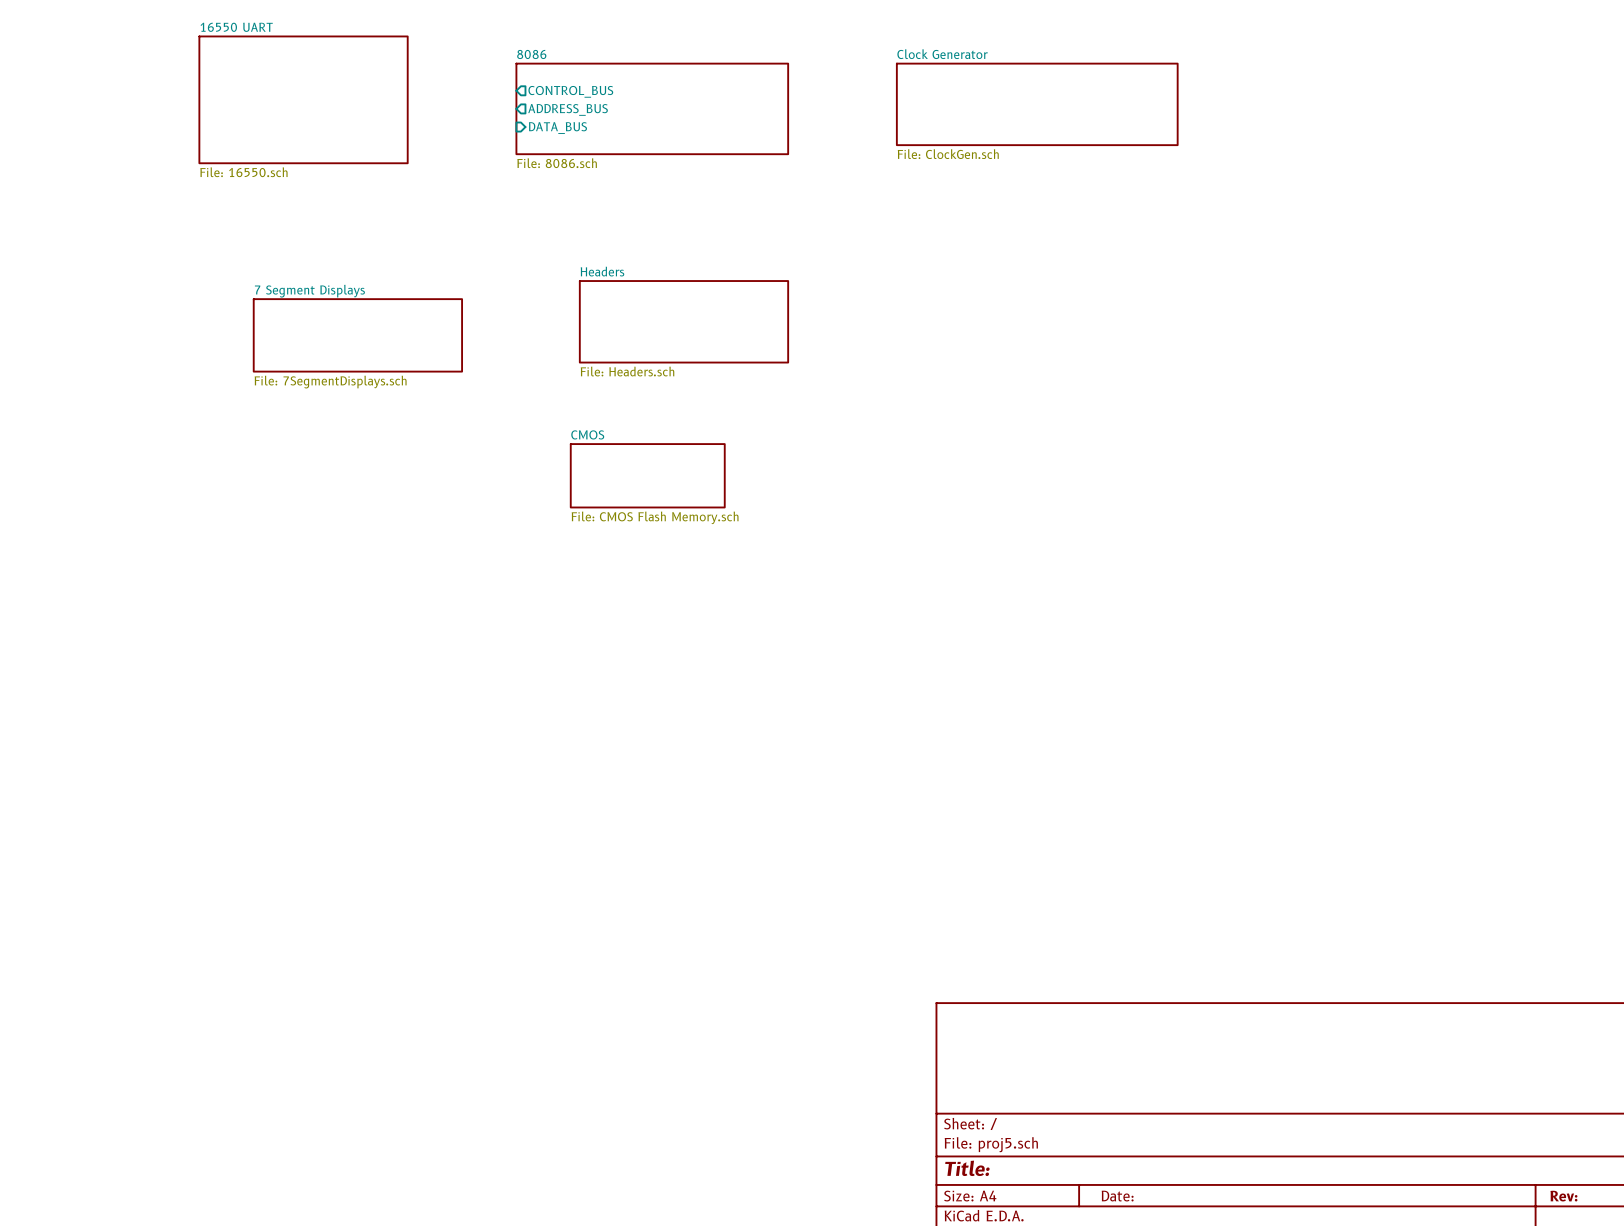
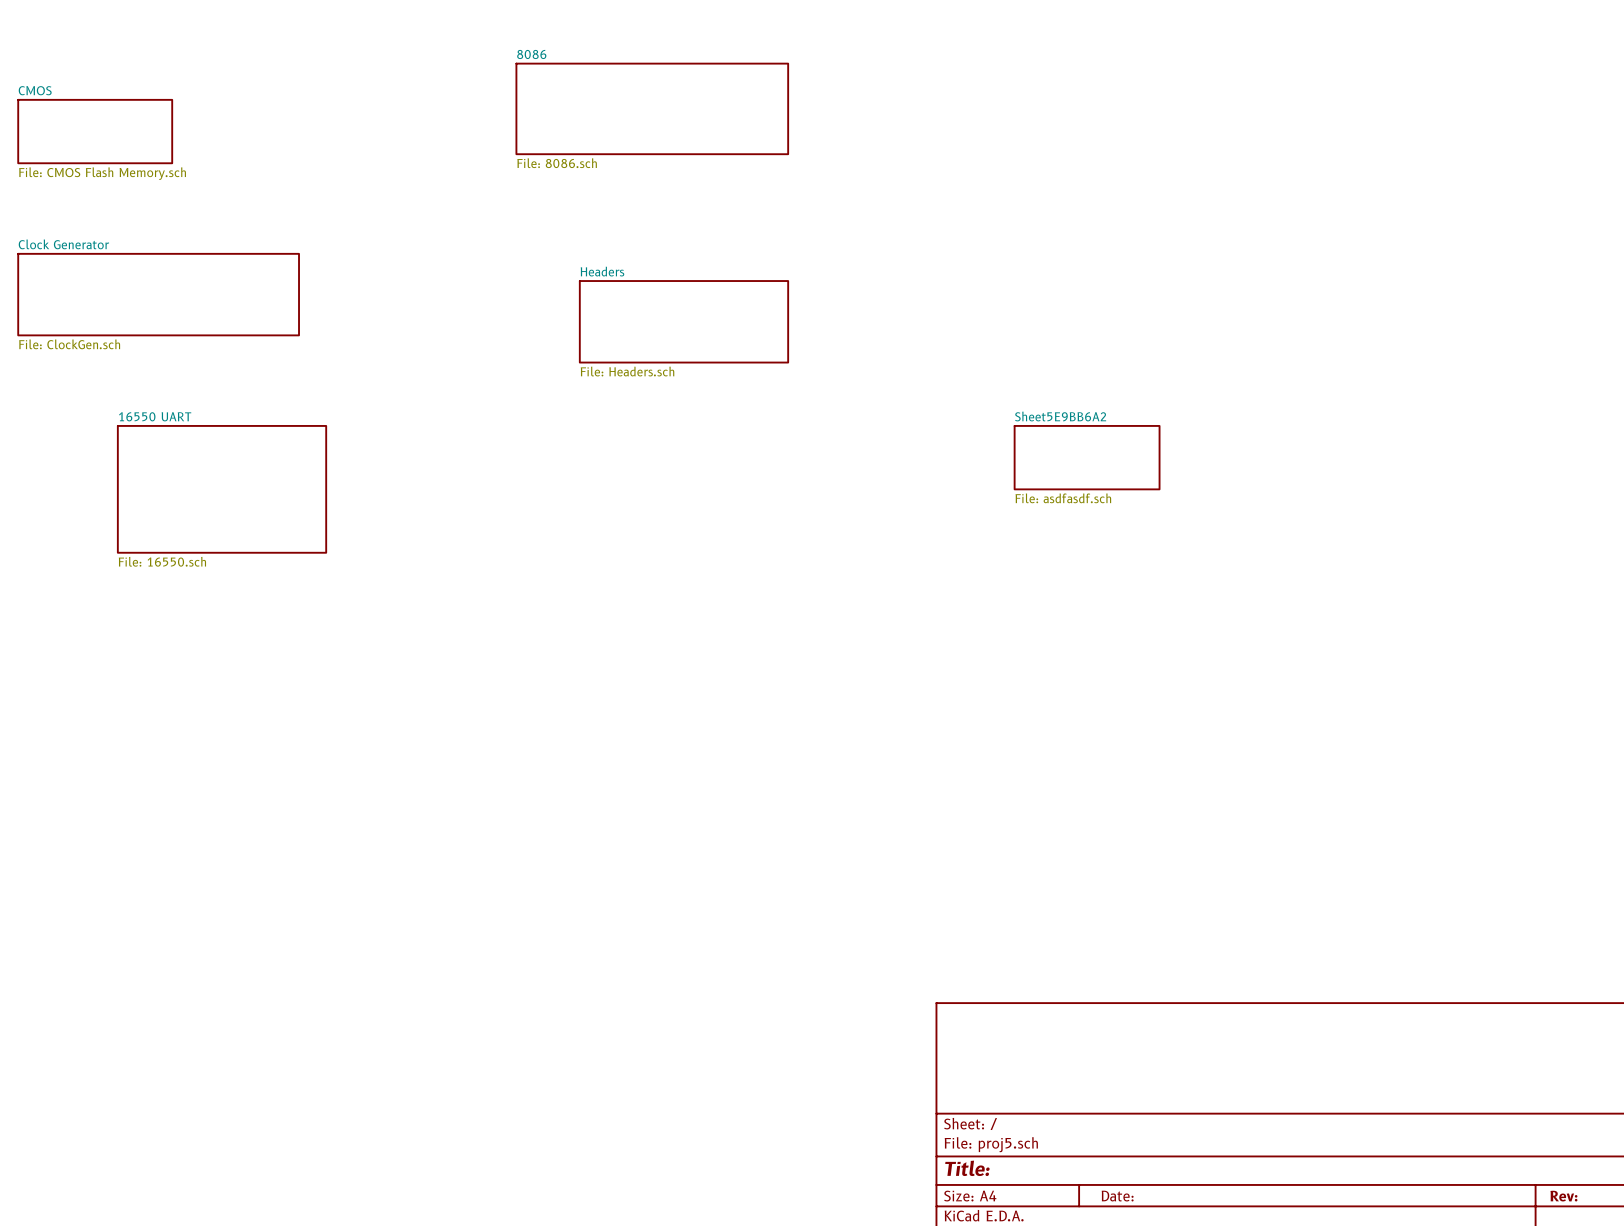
sheet pin: CONTROL_BUS (570, 91) -> none
sheet 16550 UART position: (303, 99) -> (222, 489)
sheet Clock Generator: File: ClockGen.sch (1037, 104) -> none
sheet pin: ADDRESS_BUS (568, 109) -> none
sheet pin: DATA_BUS (557, 128) -> none
sheet CMOS: none -> File: CMOS Flash Memory.sch (95, 131)
sheet Clock Generator: none -> File: ClockGen.sch (158, 294)
sheet 7 Segment Displays: File: 7SegmentDisplays.sch (357, 335) -> none
sheet Sheet5E9BB6A2: none -> File: asdfasdf.sch (1087, 457)
sheet CMOS: File: CMOS Flash Memory.sch (647, 475) -> none

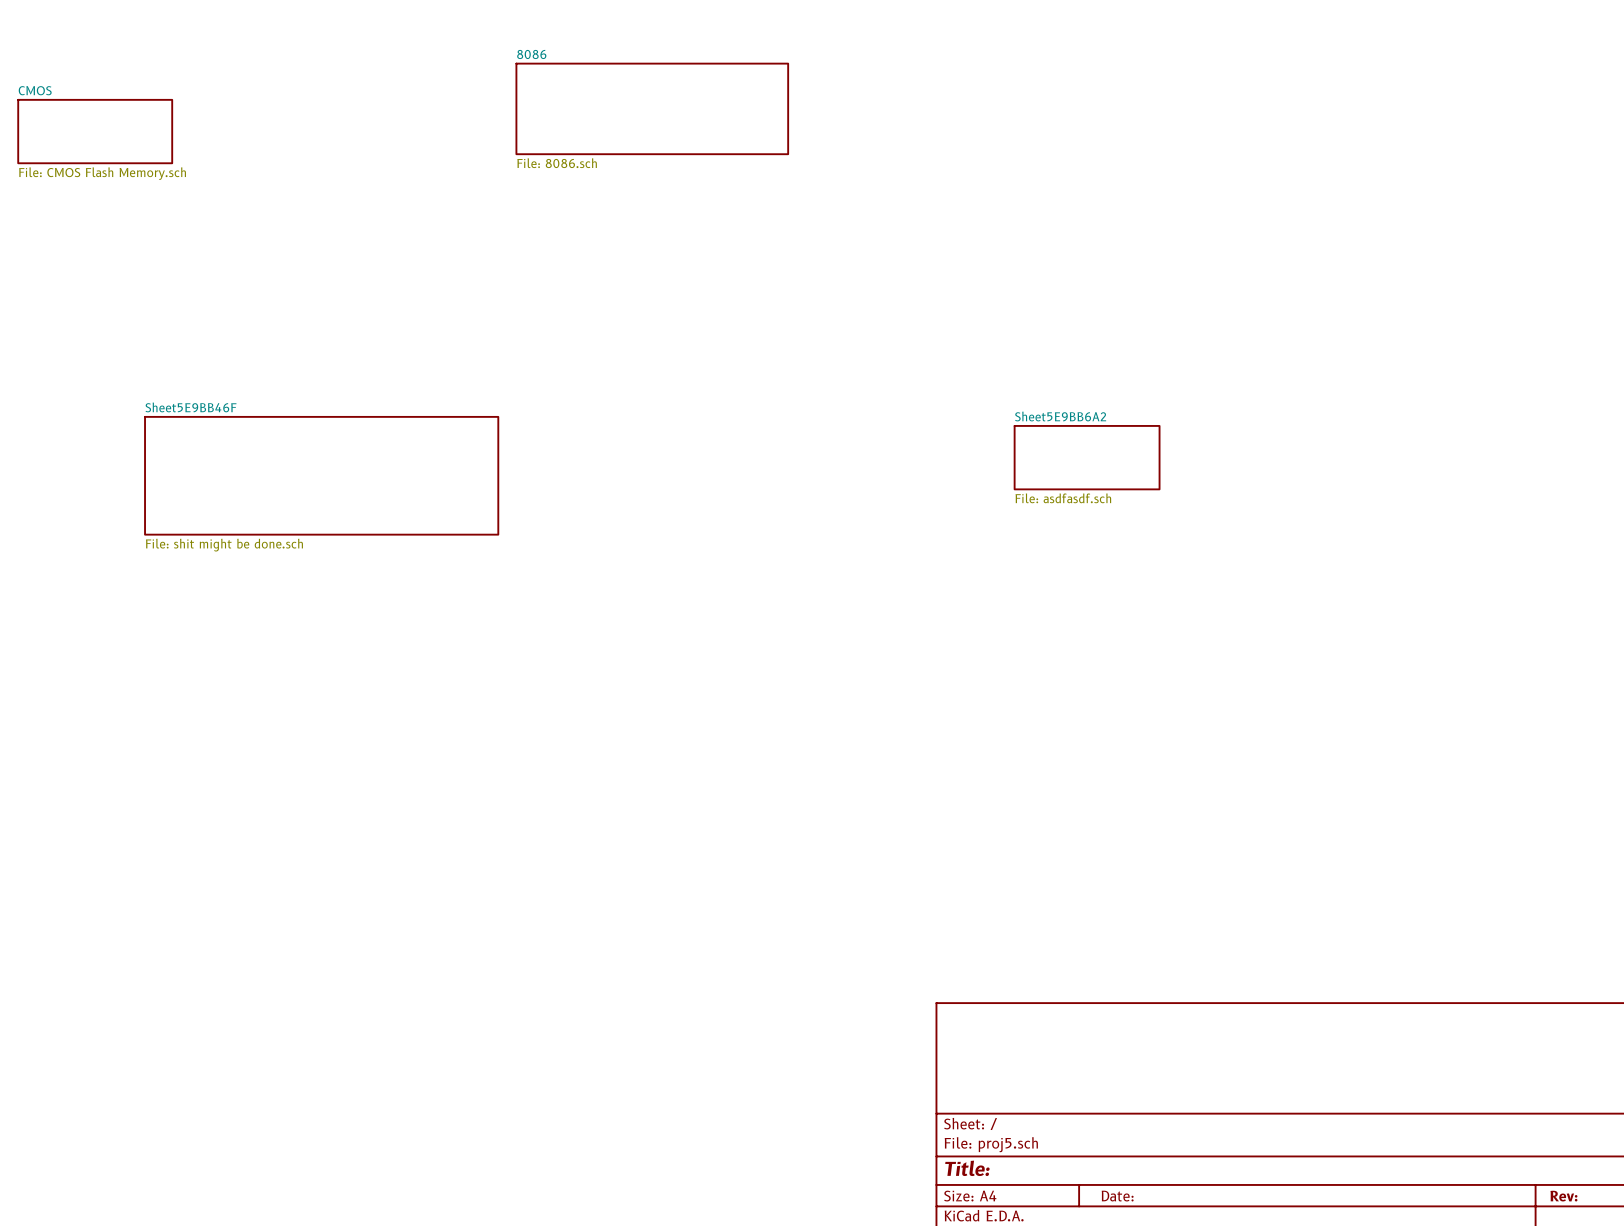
sheet Clock Generator: File: ClockGen.sch (158, 294) -> none
sheet Headers: File: Headers.sch (683, 321) -> none
sheet Sheet5E9BB46F: none -> File: shit might be done.sch (321, 475)
sheet 16550 UART: File: 16550.sch (222, 489) -> none

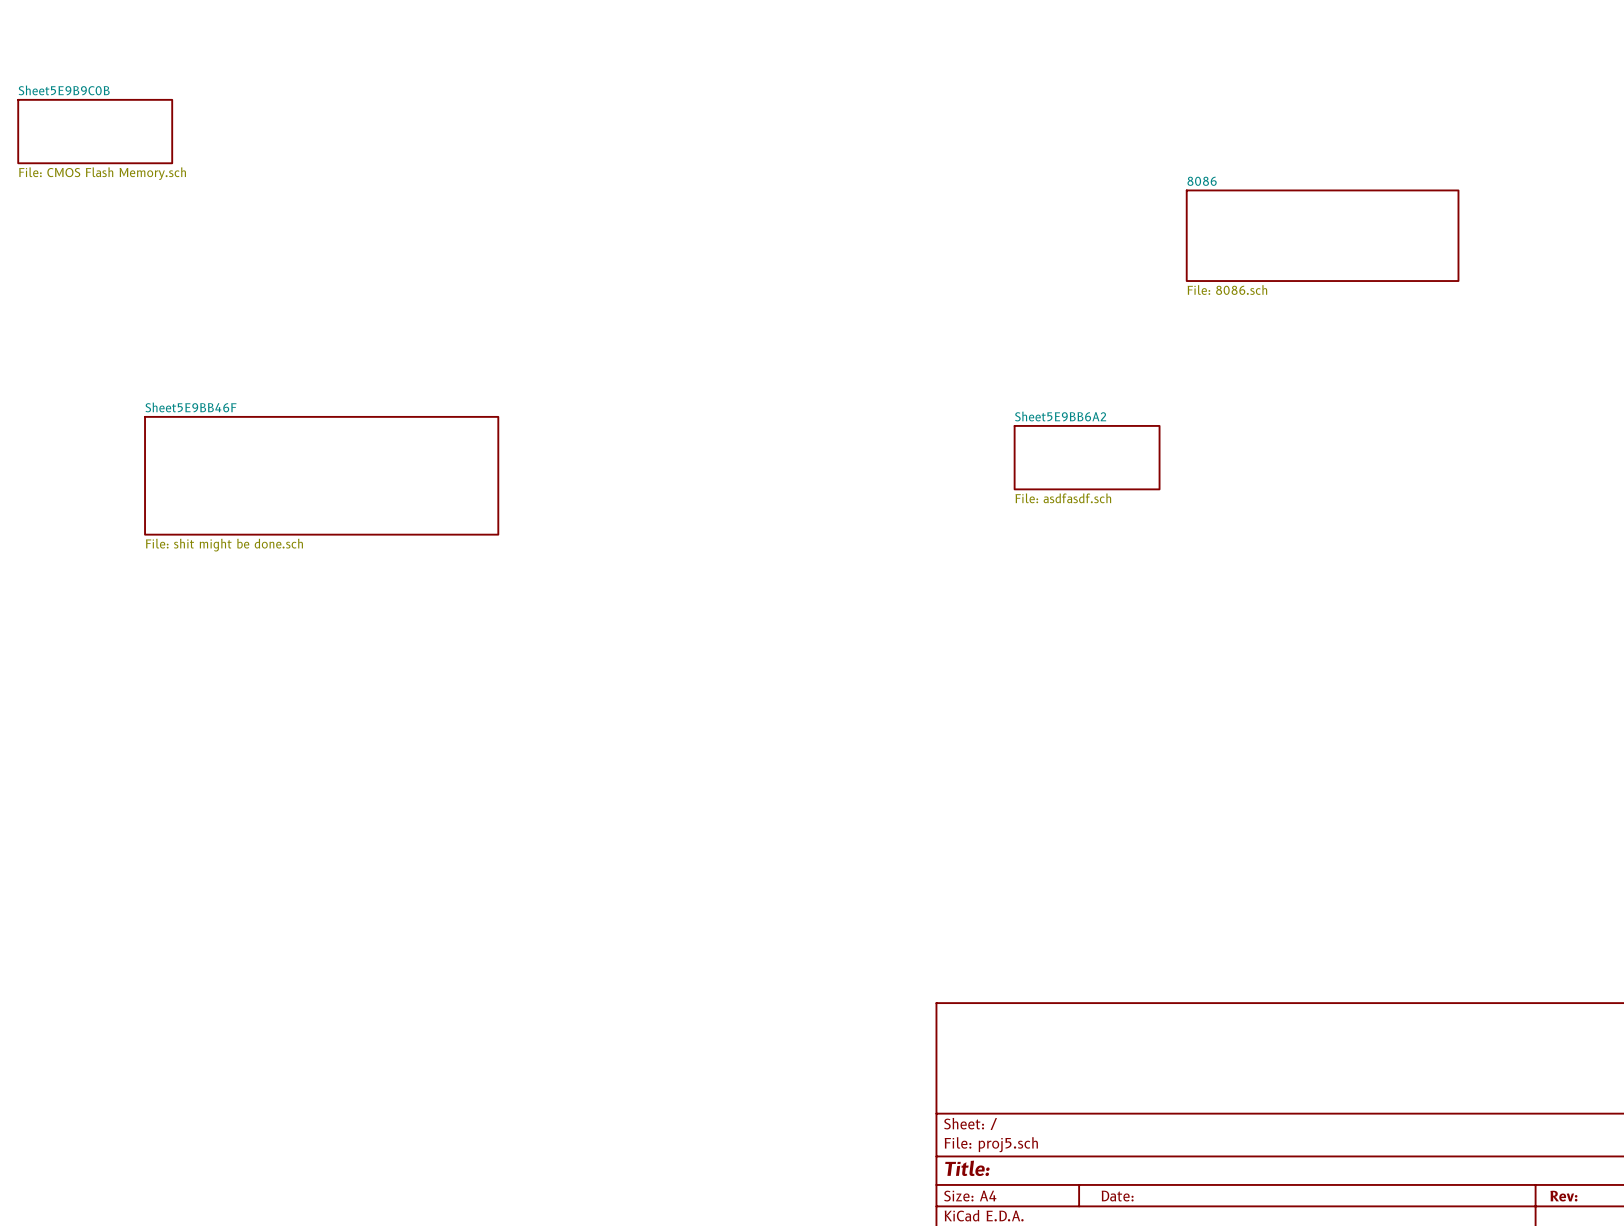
sheet CMOS name: CMOS (35, 90) -> Sheet5E9B9C0B (64, 90)
sheet 8086 position: (652, 108) -> (1322, 235)

